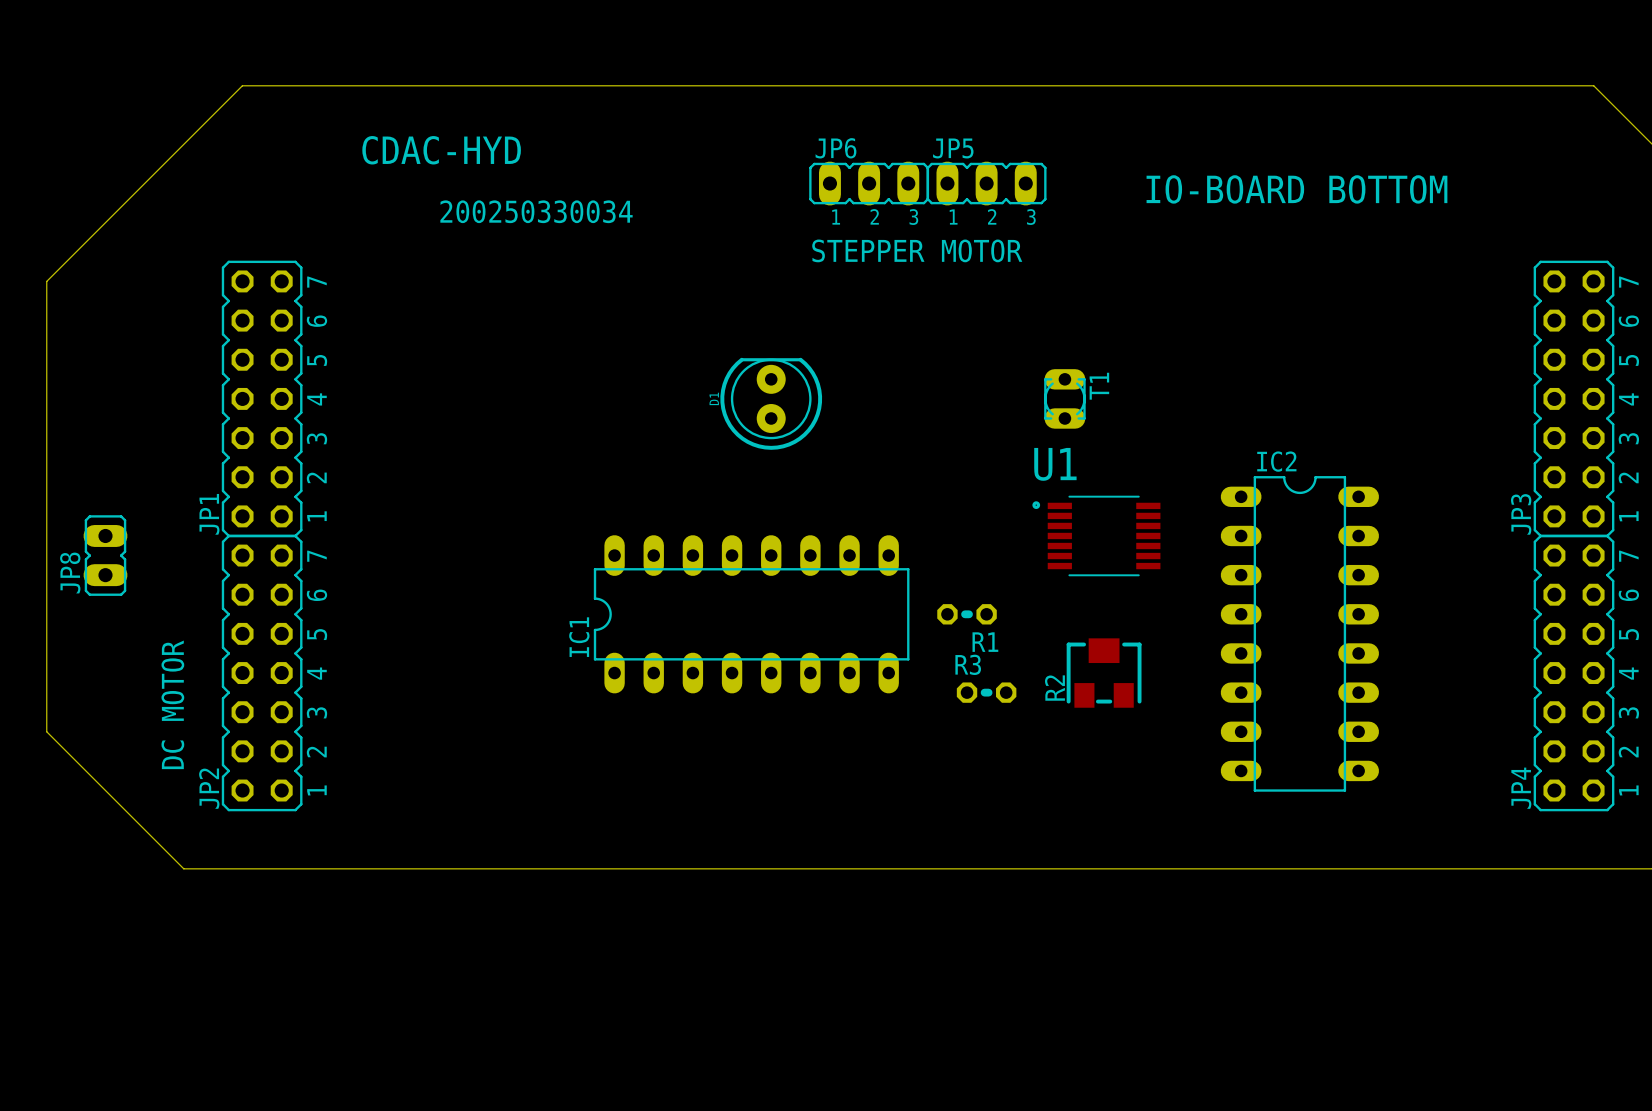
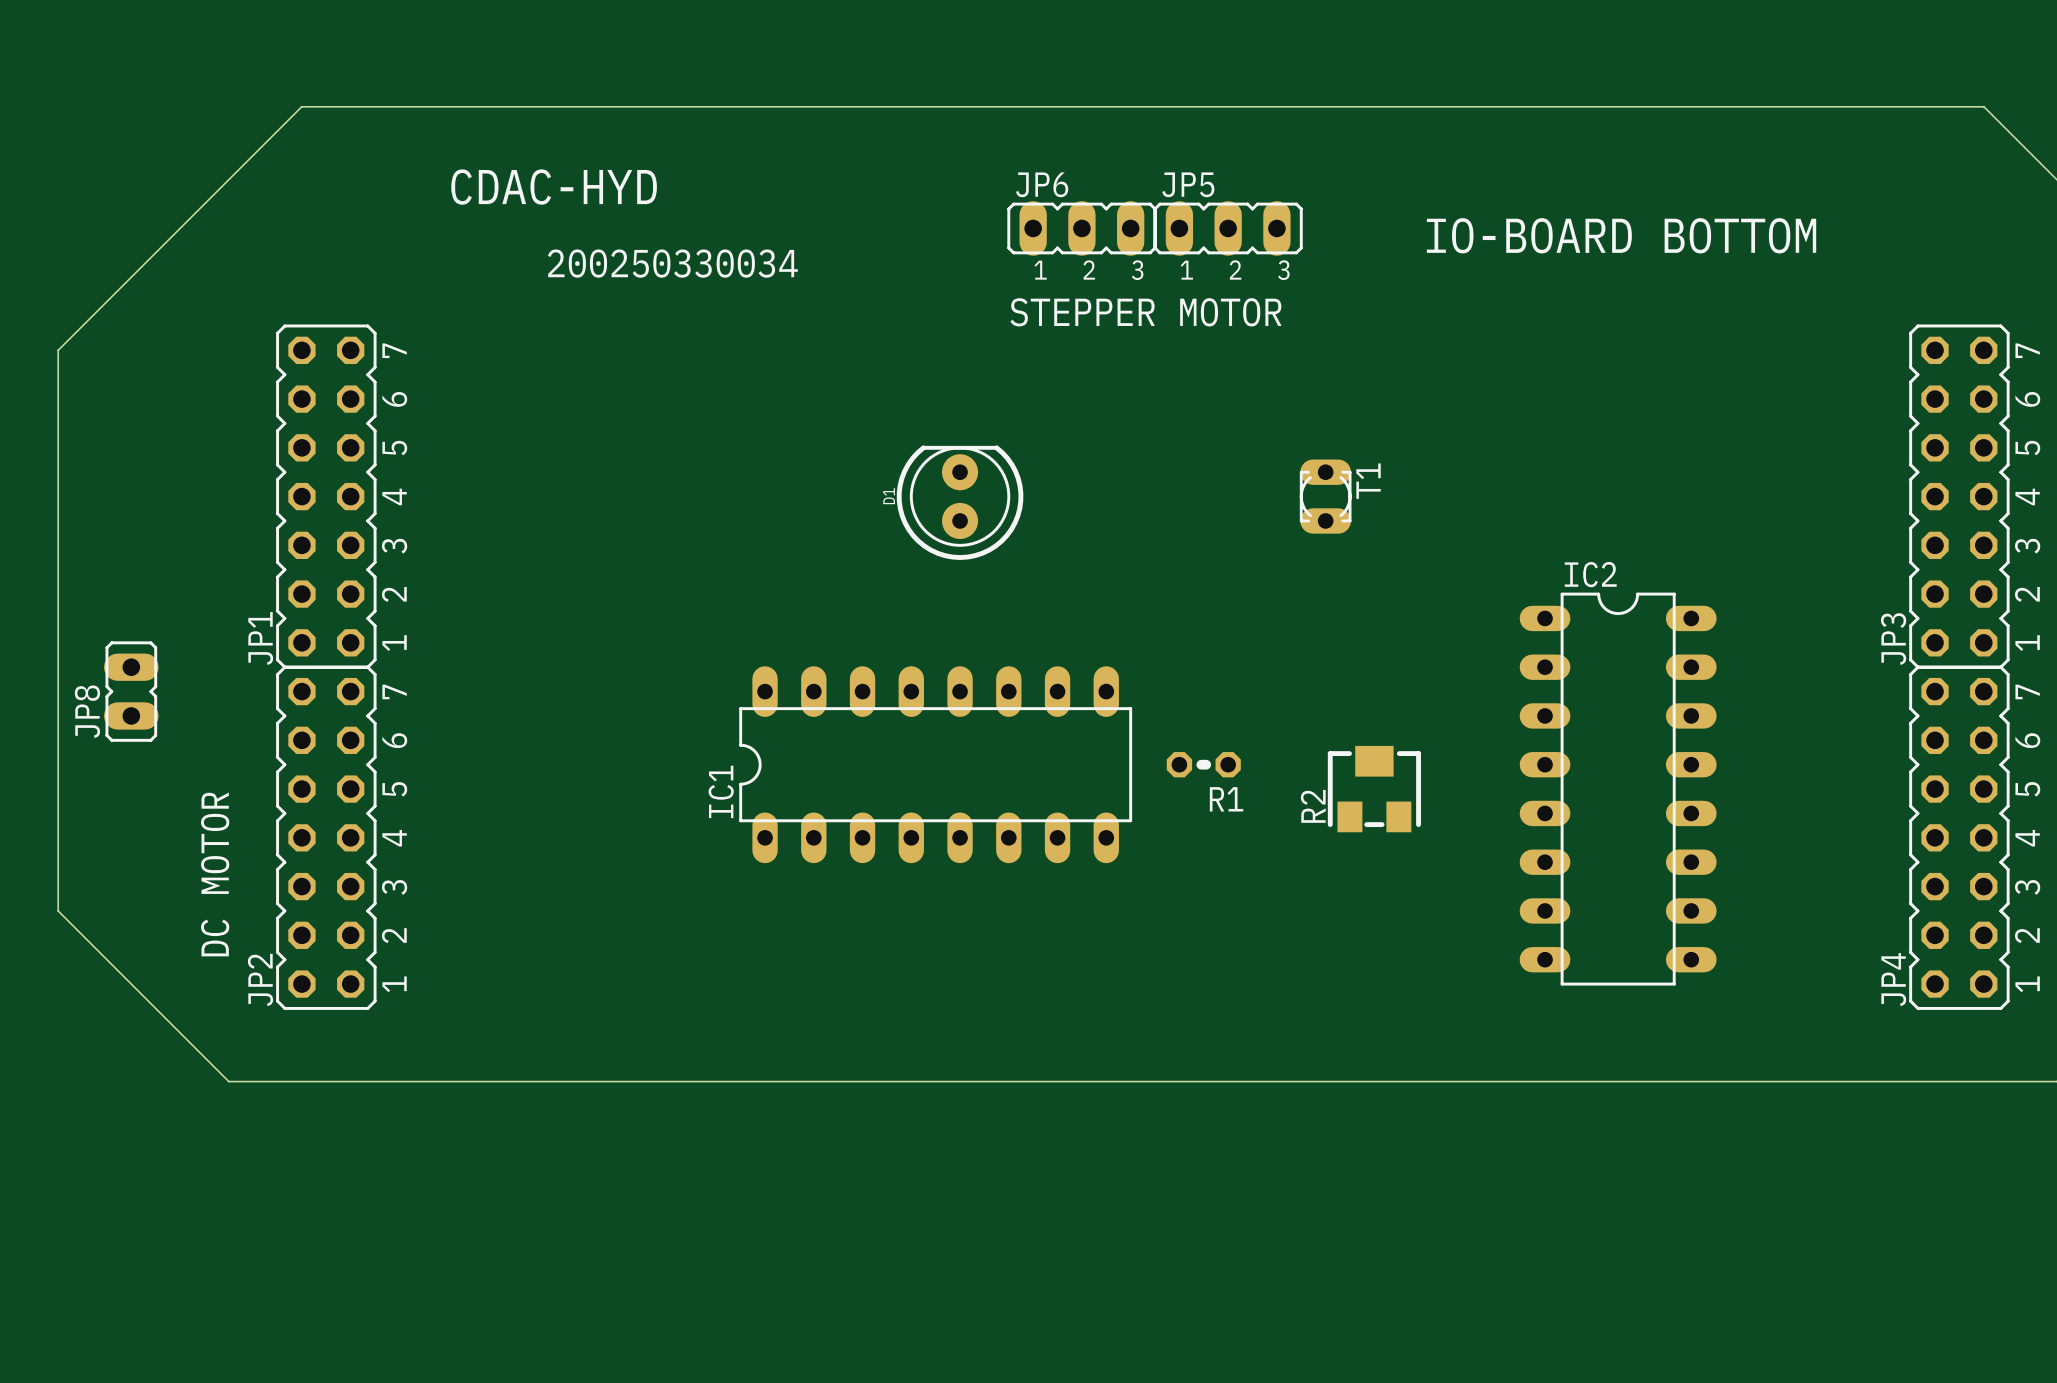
U1: (1096, 535) -> none
R2 position: (1104, 673) -> (1374, 789)
R3: (986, 692) -> none

